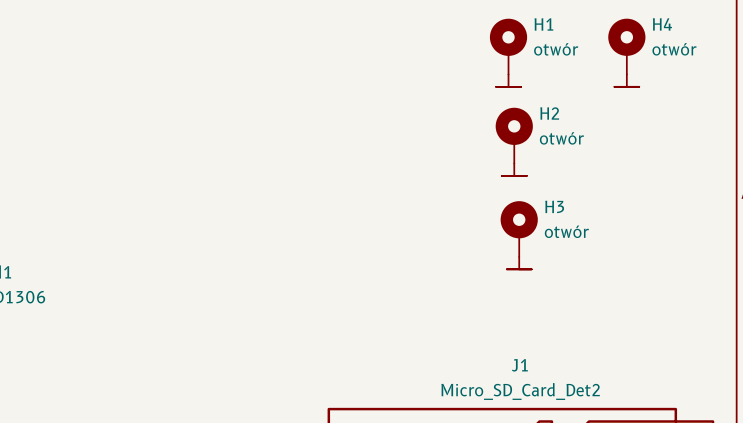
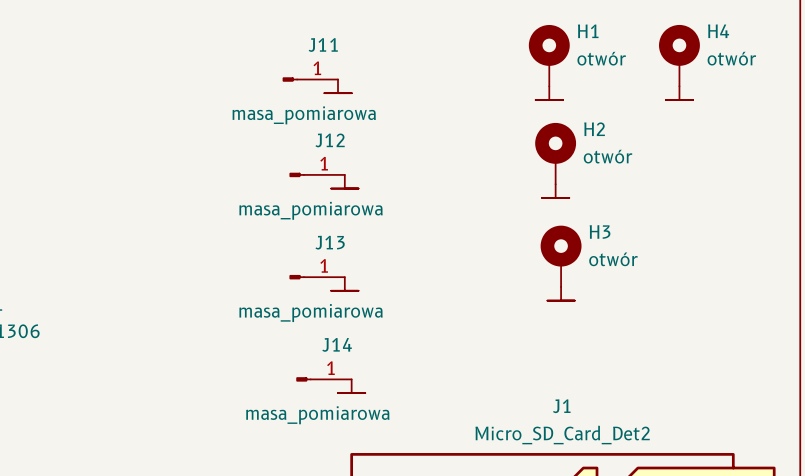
J11: none -> masa_pomiarowa (310, 79)
power symbol: none -> (338, 86)
J12: none -> masa_pomiarowa (317, 174)
power symbol: none -> (344, 181)
J13: none -> masa_pomiarowa (317, 277)
power symbol: none -> (344, 283)
J14: none -> masa_pomiarowa (323, 379)
power symbol: none -> (351, 386)

